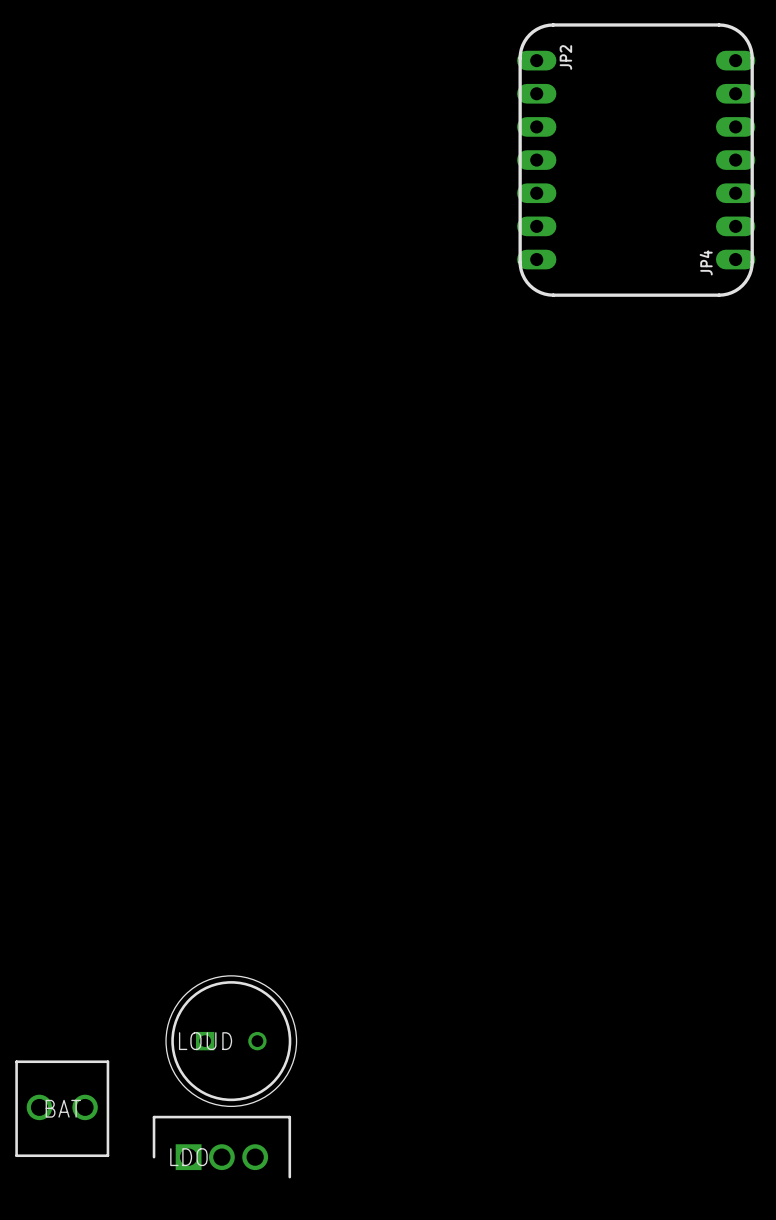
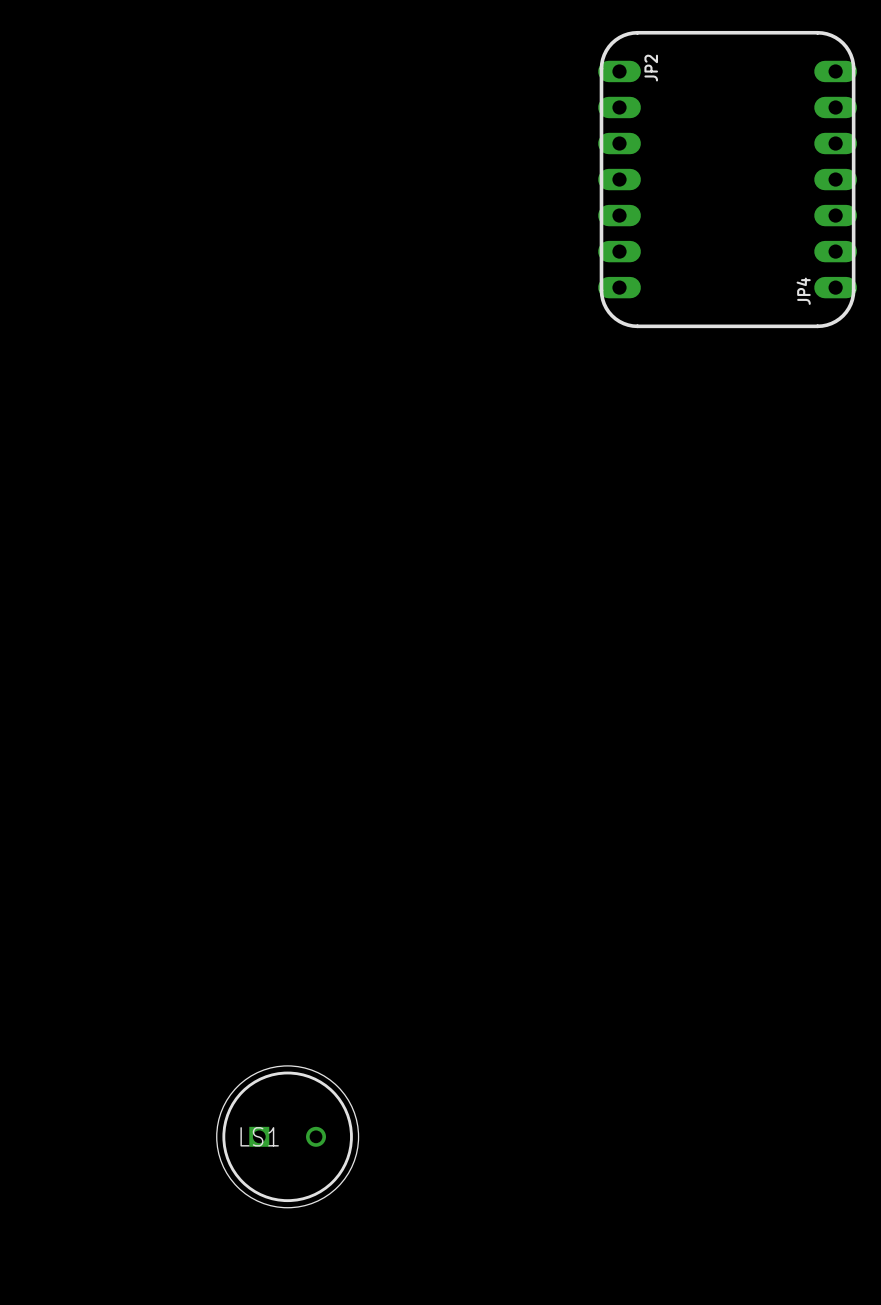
LOUD name: LOUD (205, 1041) -> LS1 (259, 1136)
BAT: (62, 1108) -> none
LDO: (221, 1147) -> none

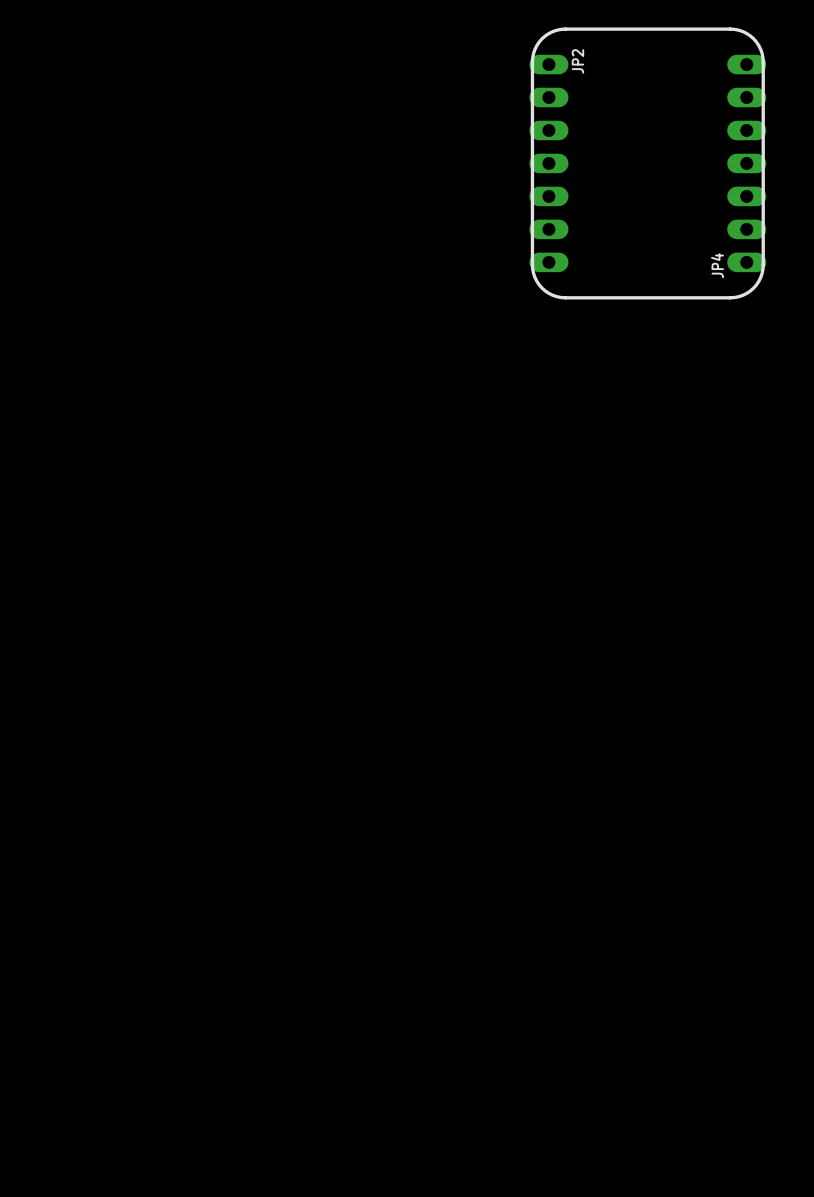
LS1: (287, 1136) -> none

